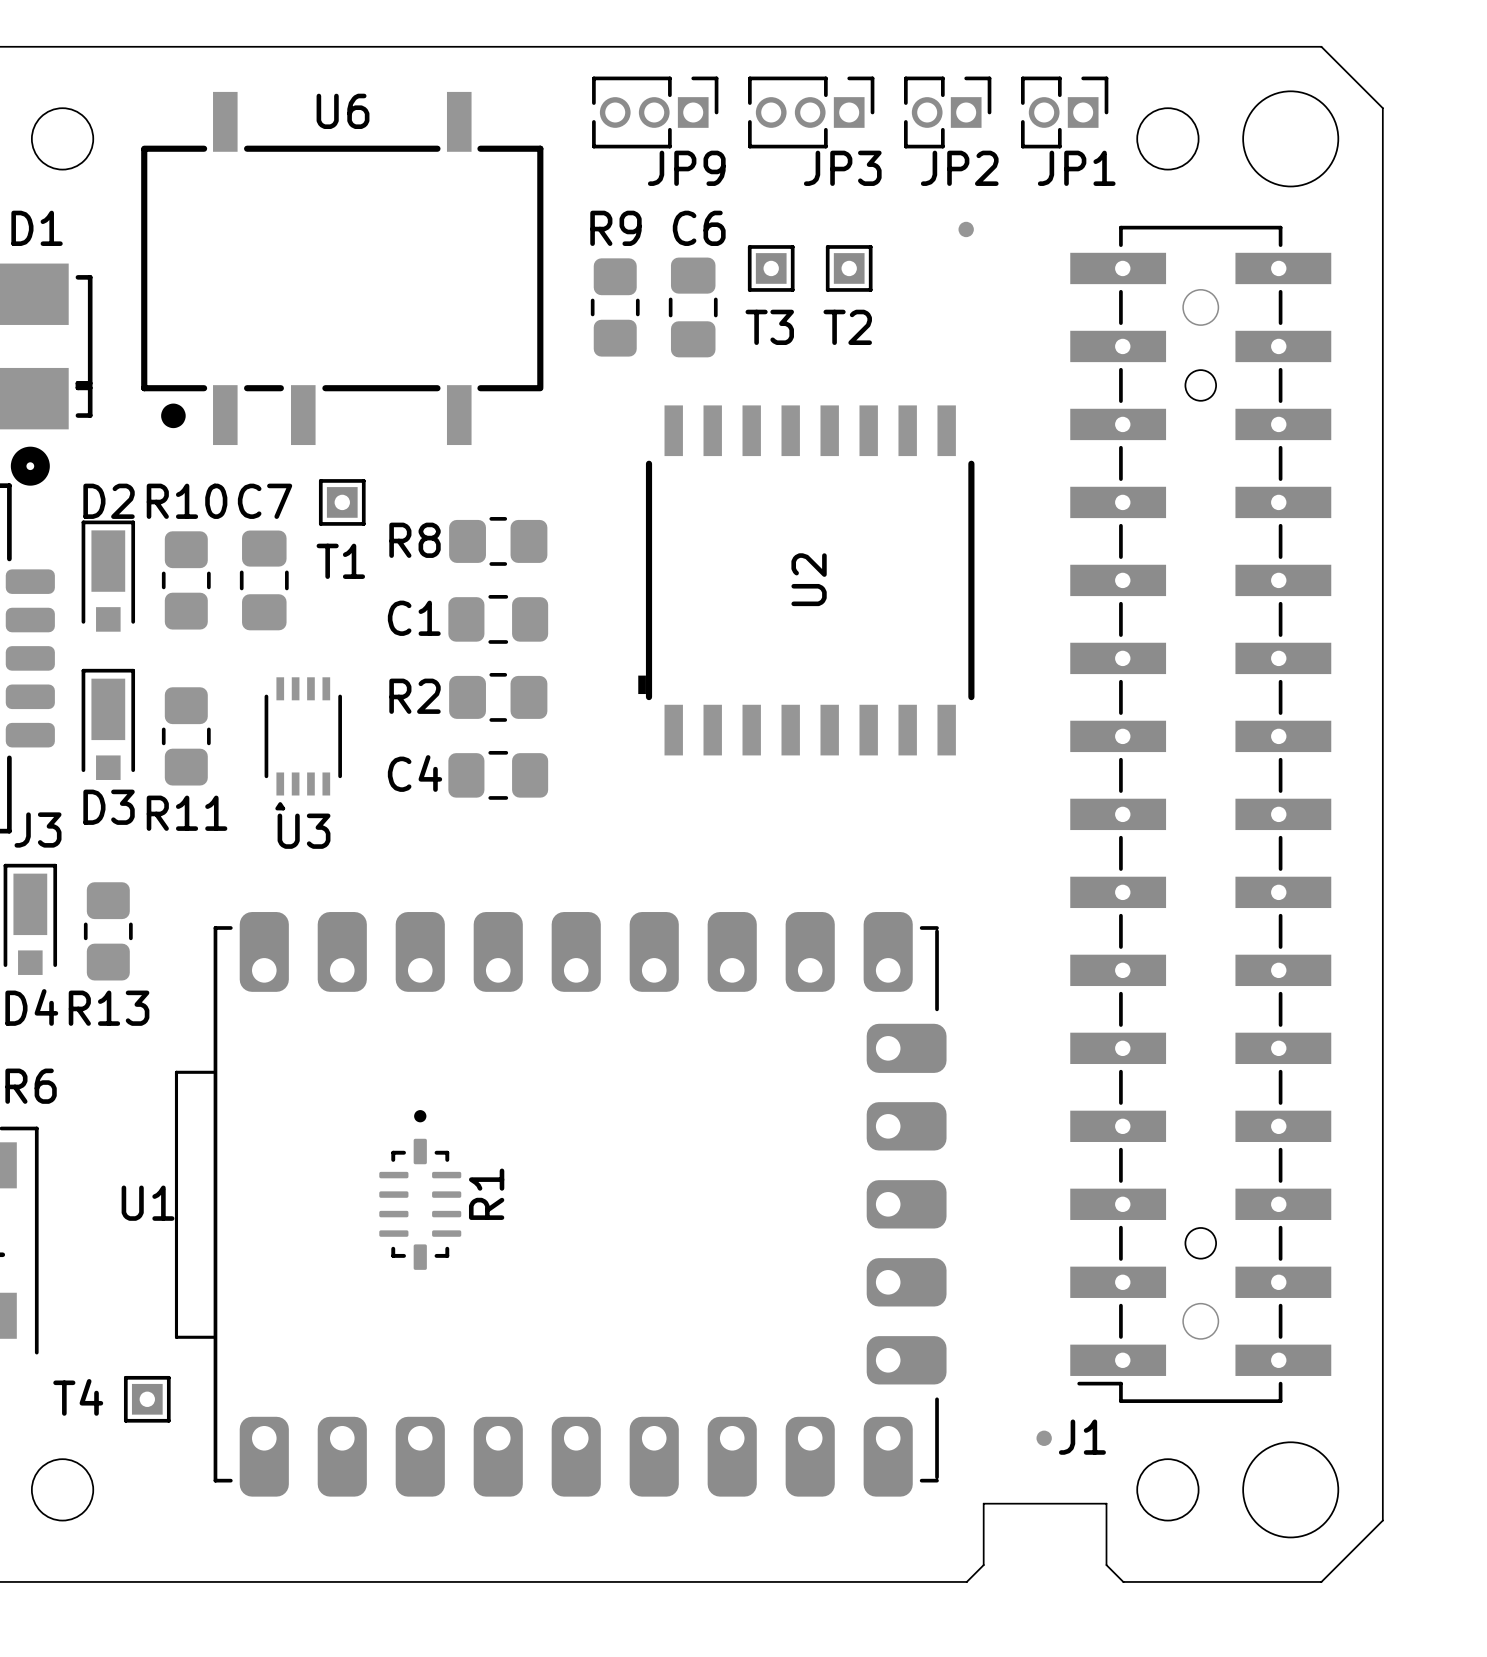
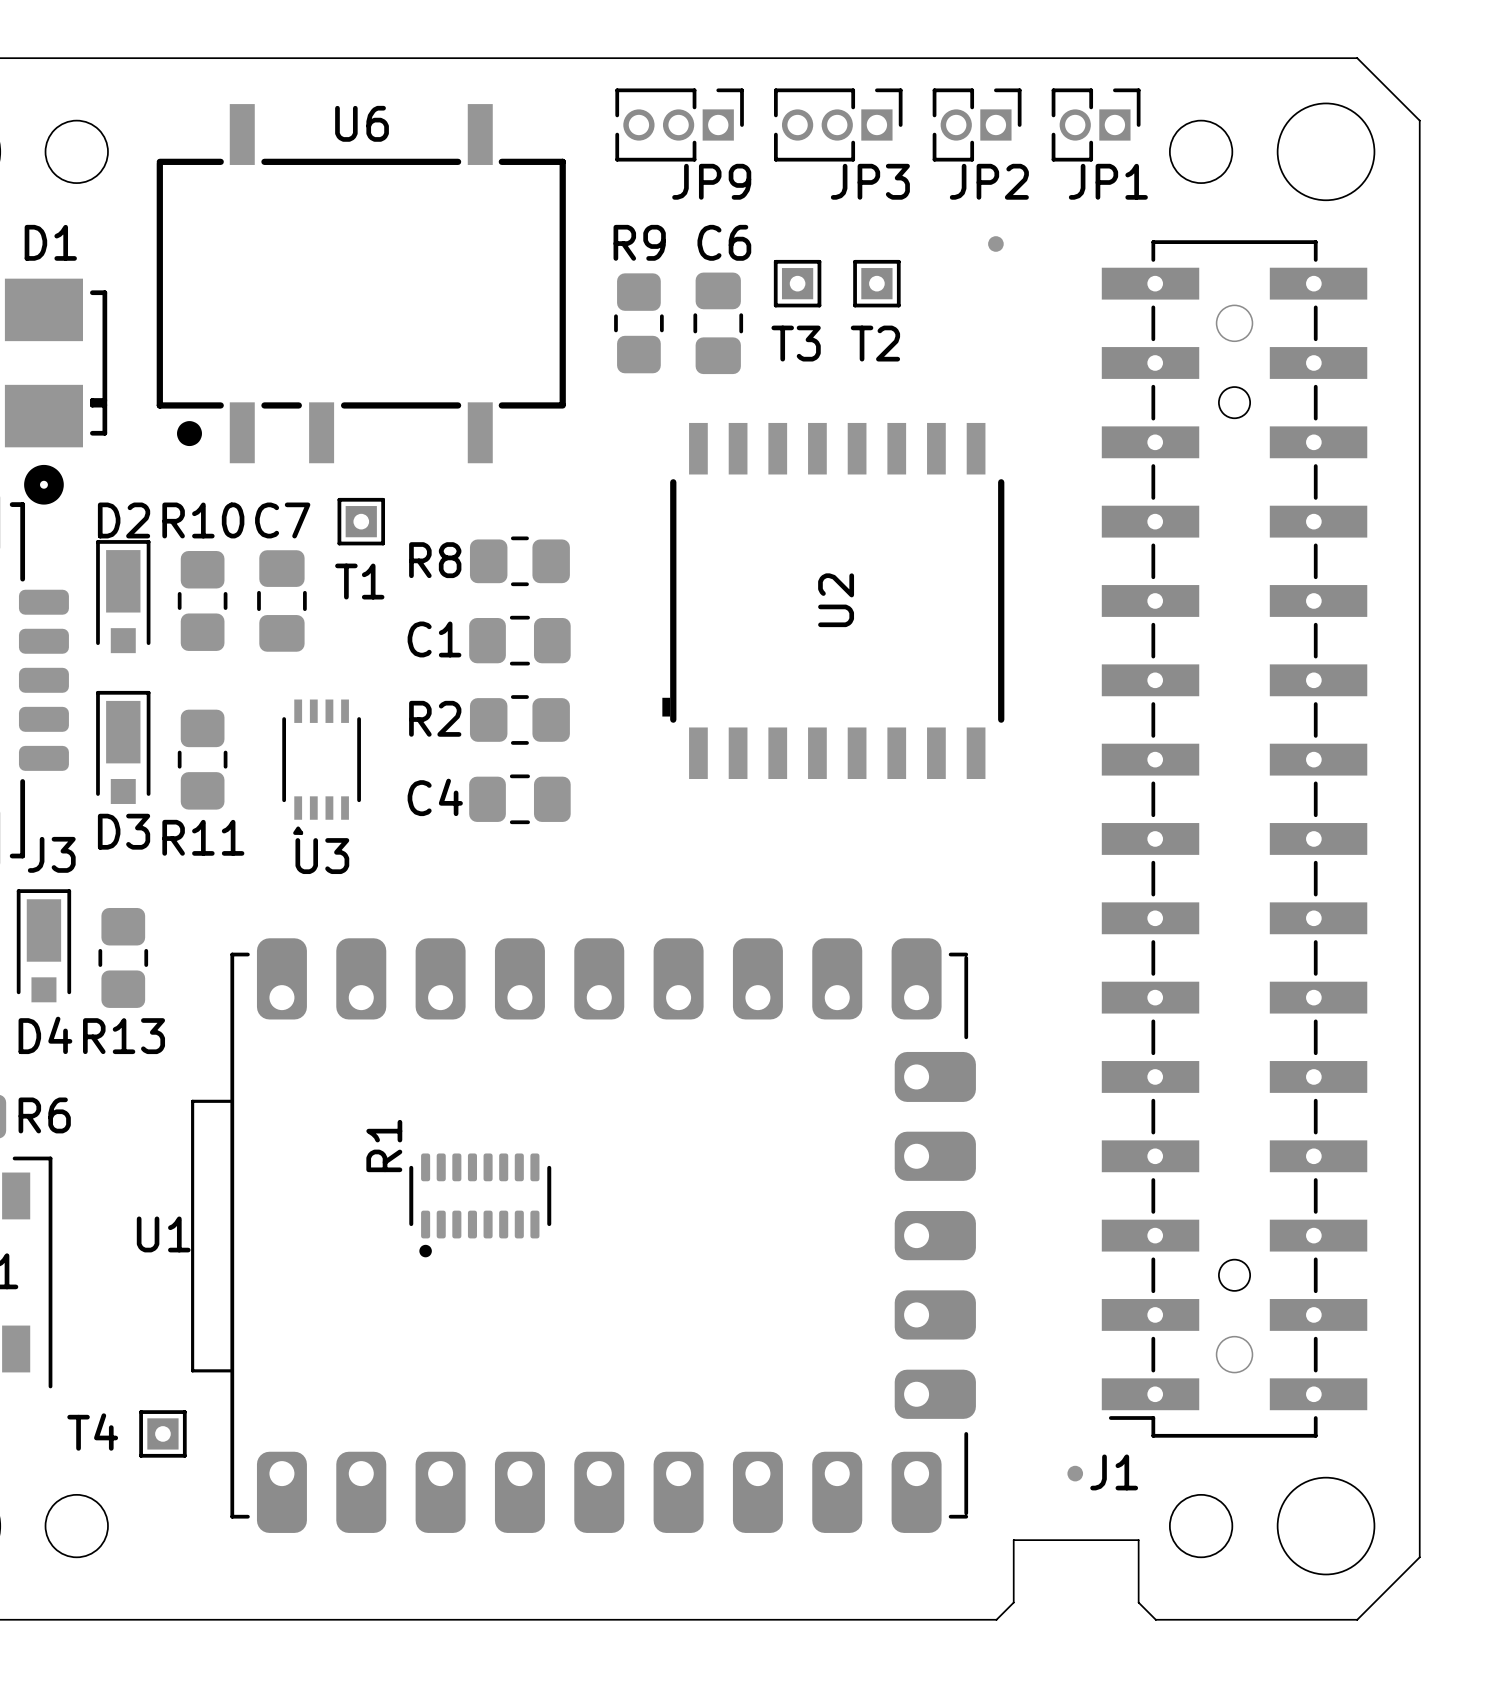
R1 footprint: [379, 1110, 462, 1270] -> [409, 1153, 552, 1258]
R1 name position: R1 (486, 1194) -> R1 (384, 1146)

